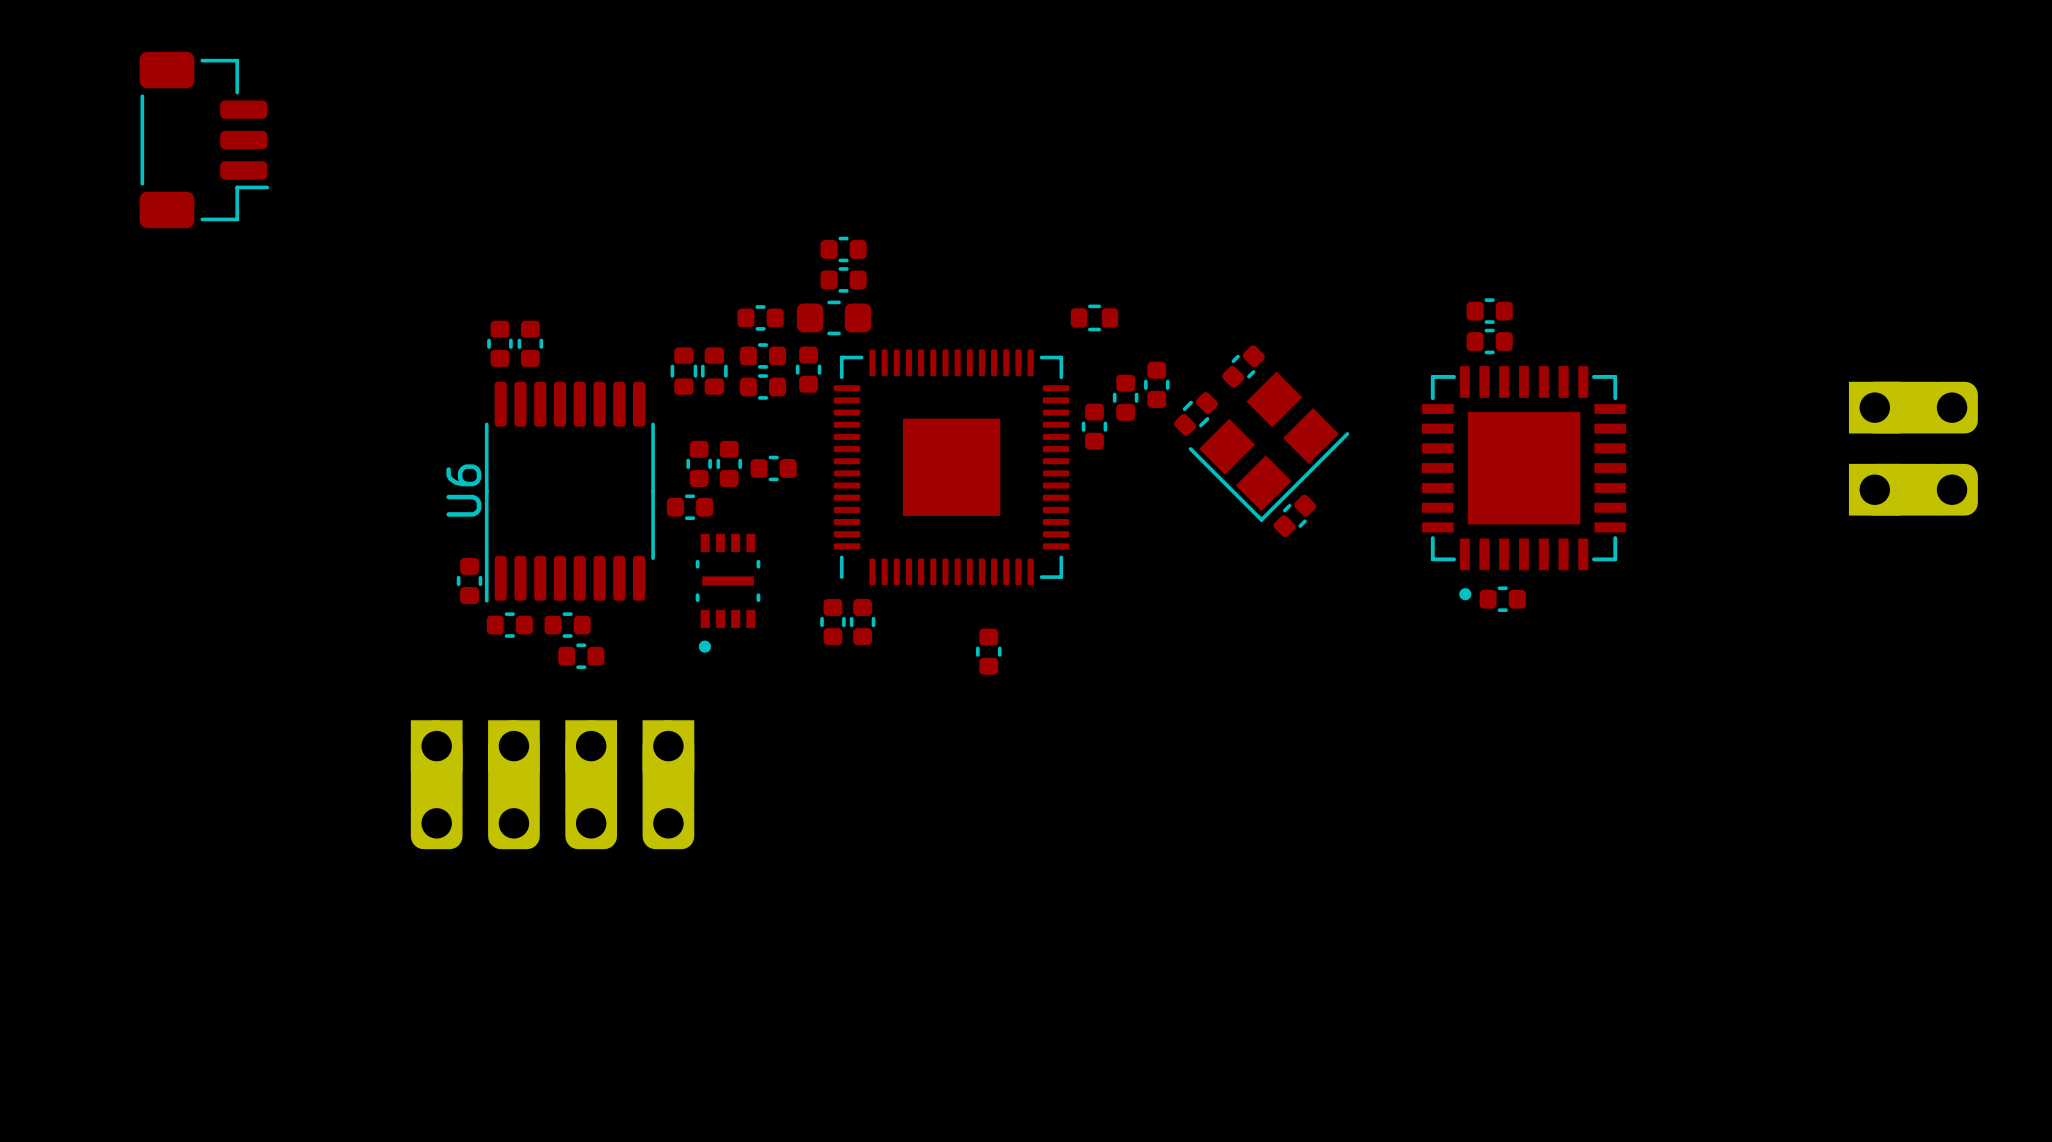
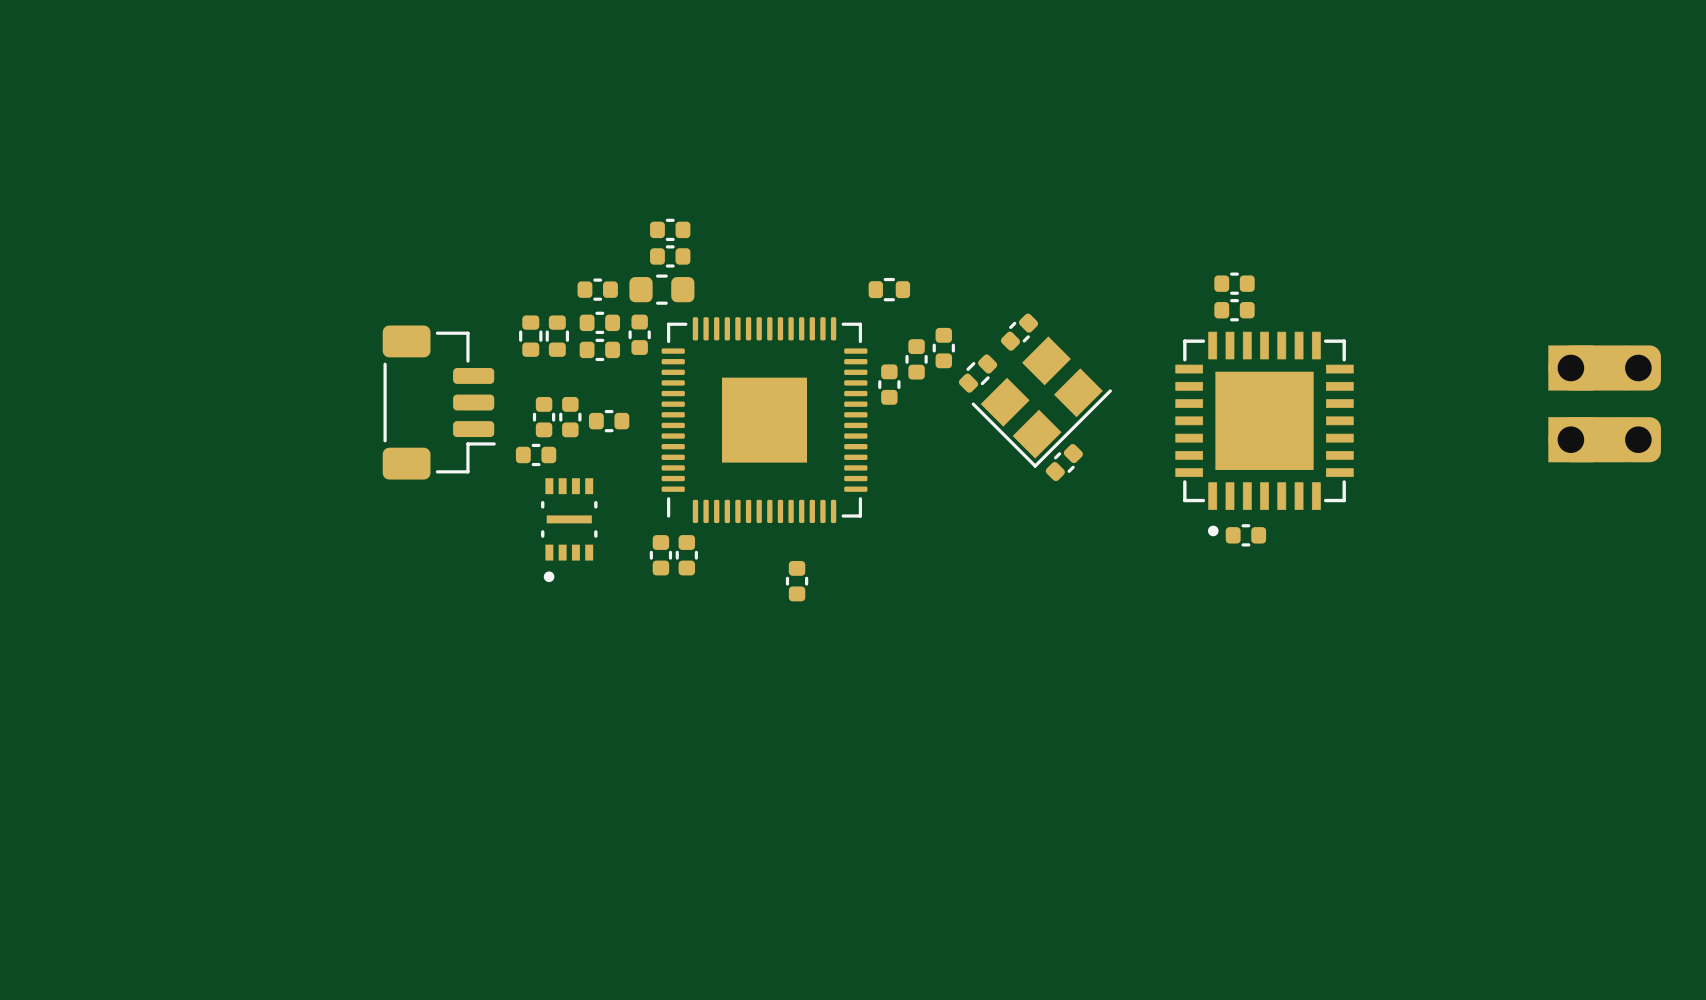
part position: (204, 140) -> (439, 402)
part: (499, 343) -> none
part: (530, 343) -> none
U6: (569, 492) -> none
part: (469, 580) -> none
part: (509, 625) -> none
part: (567, 625) -> none
part: (581, 656) -> none
part: (436, 784) -> none
part: (513, 784) -> none
part: (591, 784) -> none
part: (668, 784) -> none

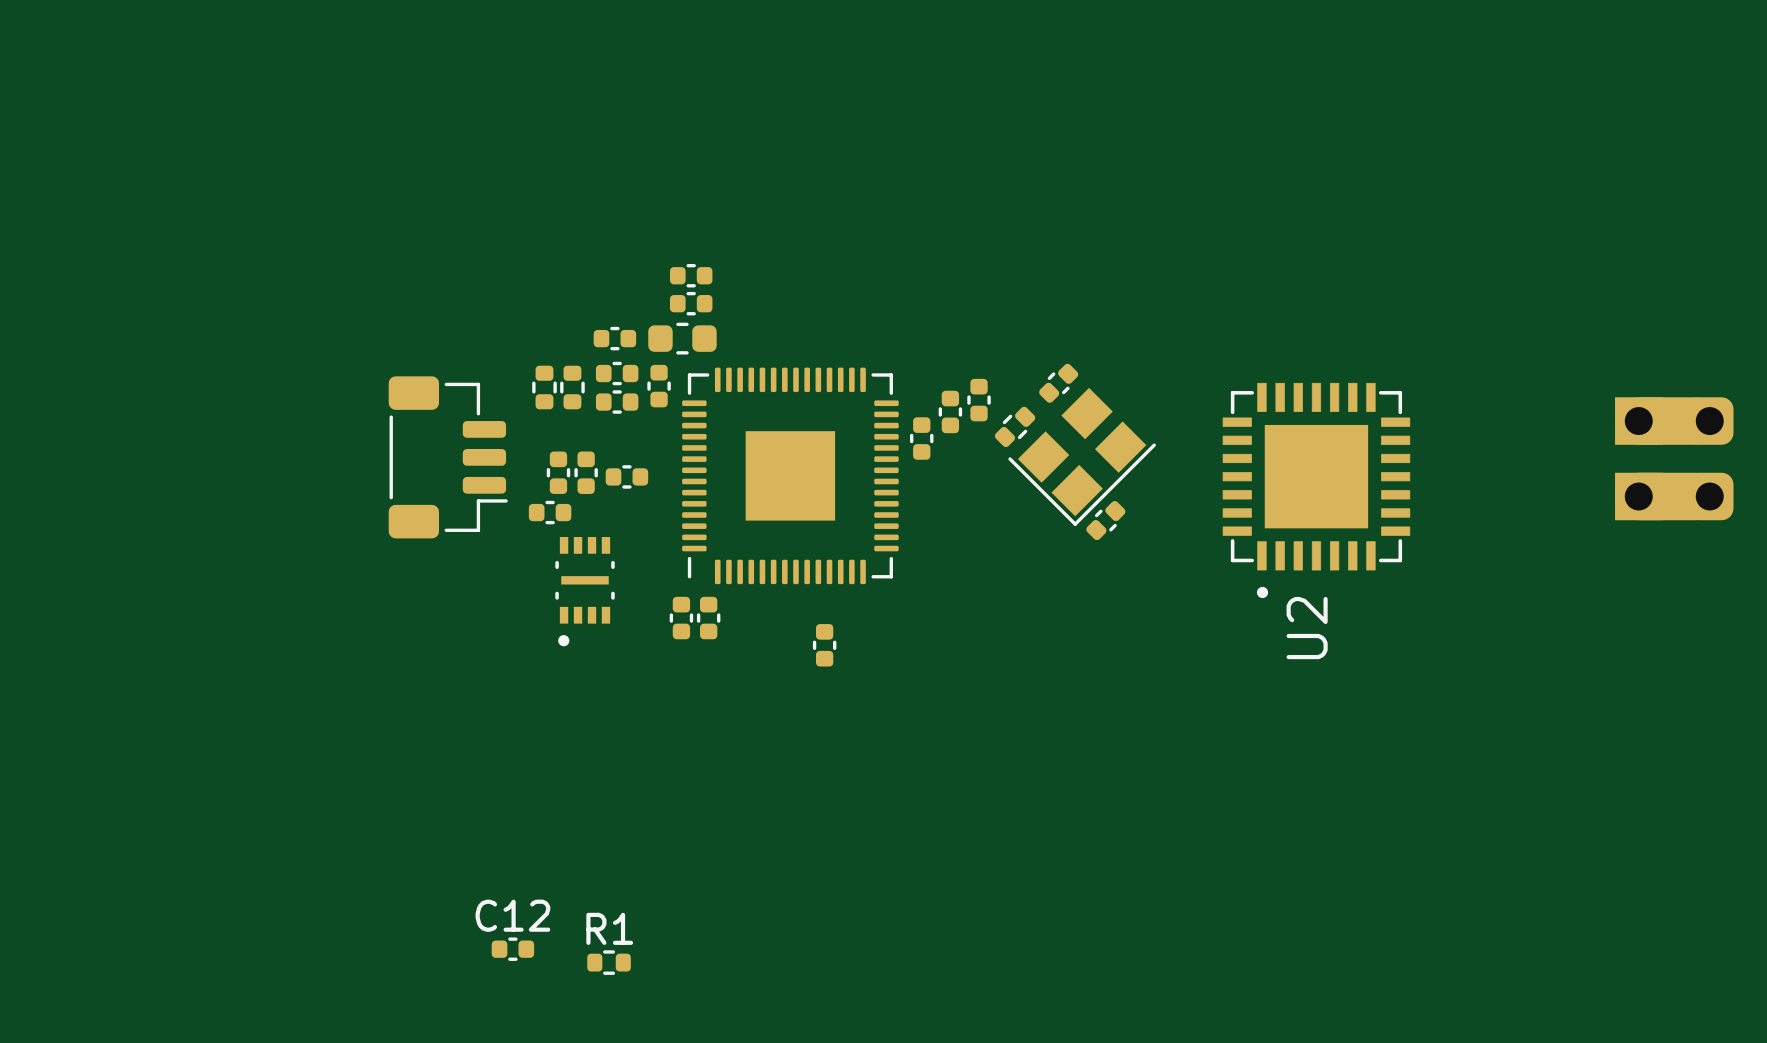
part: (1234, 283) -> none
part: (889, 289) -> none
part: (1234, 310) -> none
part: (1245, 535) -> none
U2 name: none -> U2 (1307, 628)
C12: none -> (512, 949)
R1: none -> (609, 962)

